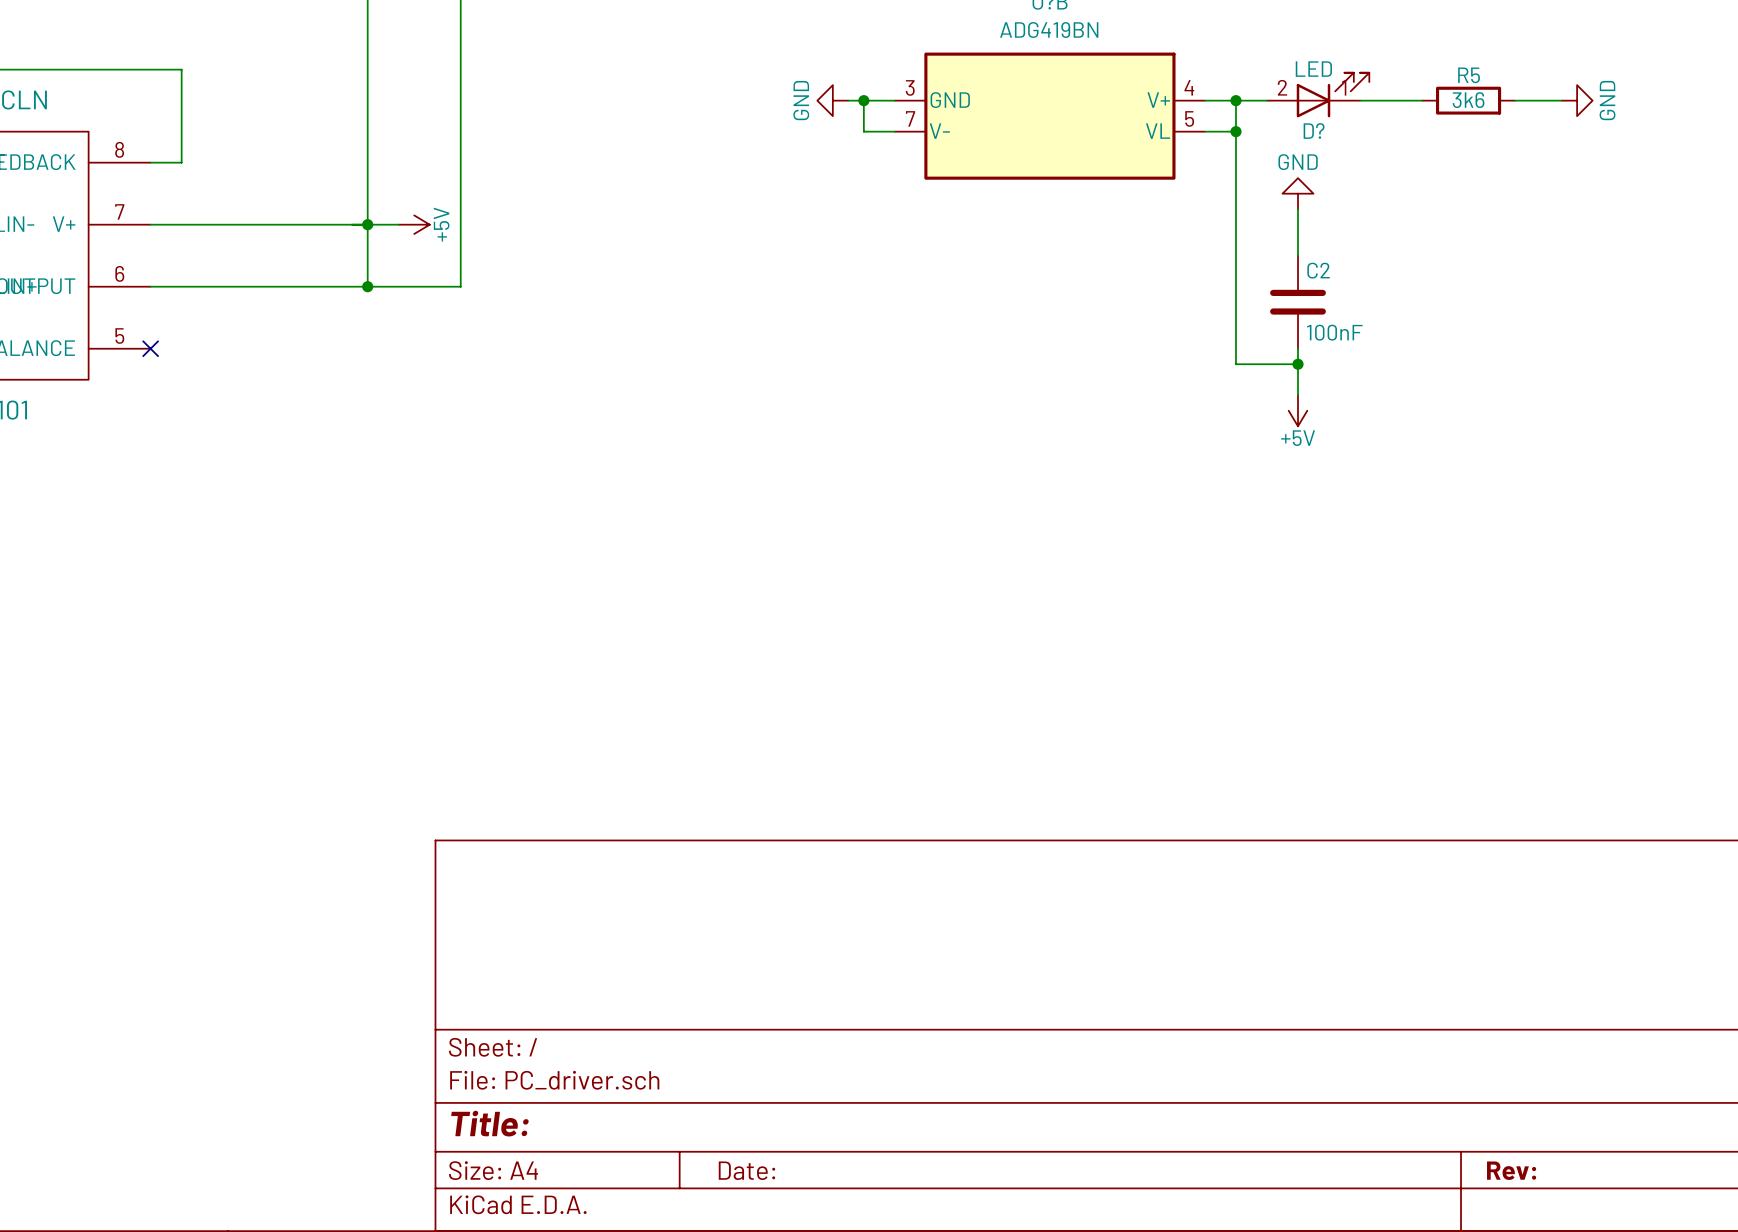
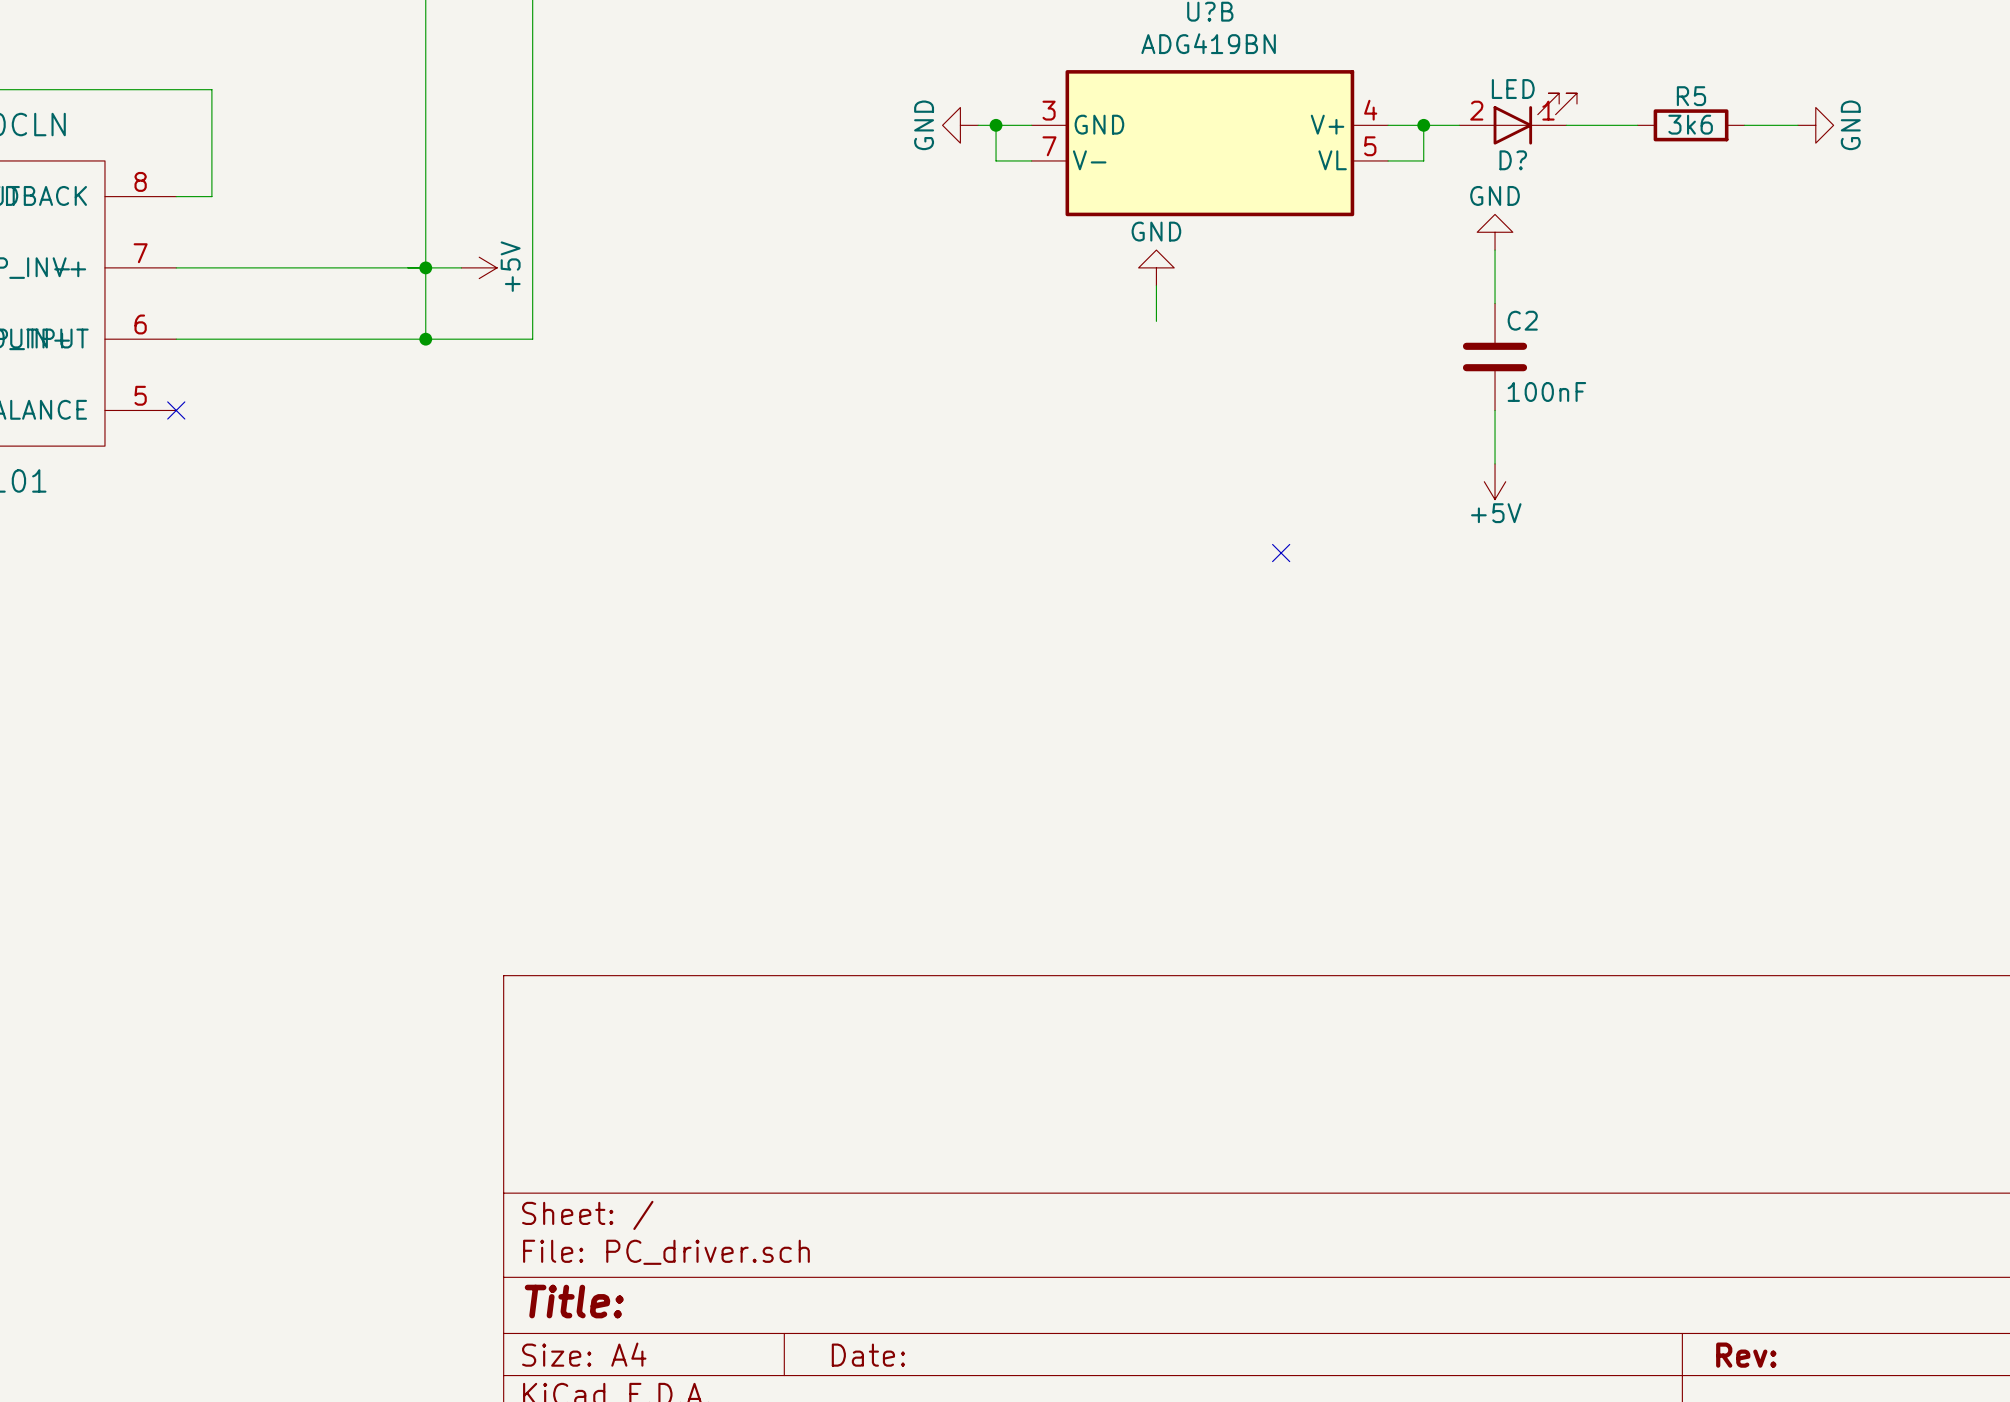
wire: (1235, 131) (1235, 364) (1298, 364) -> none
junction: (1235, 131) -> none
power symbol: none -> GND (1156, 267)
wire: none -> (1156, 285) (1156, 321)
junction: (1298, 364) -> none
no-connect mark: none -> (1281, 553)

